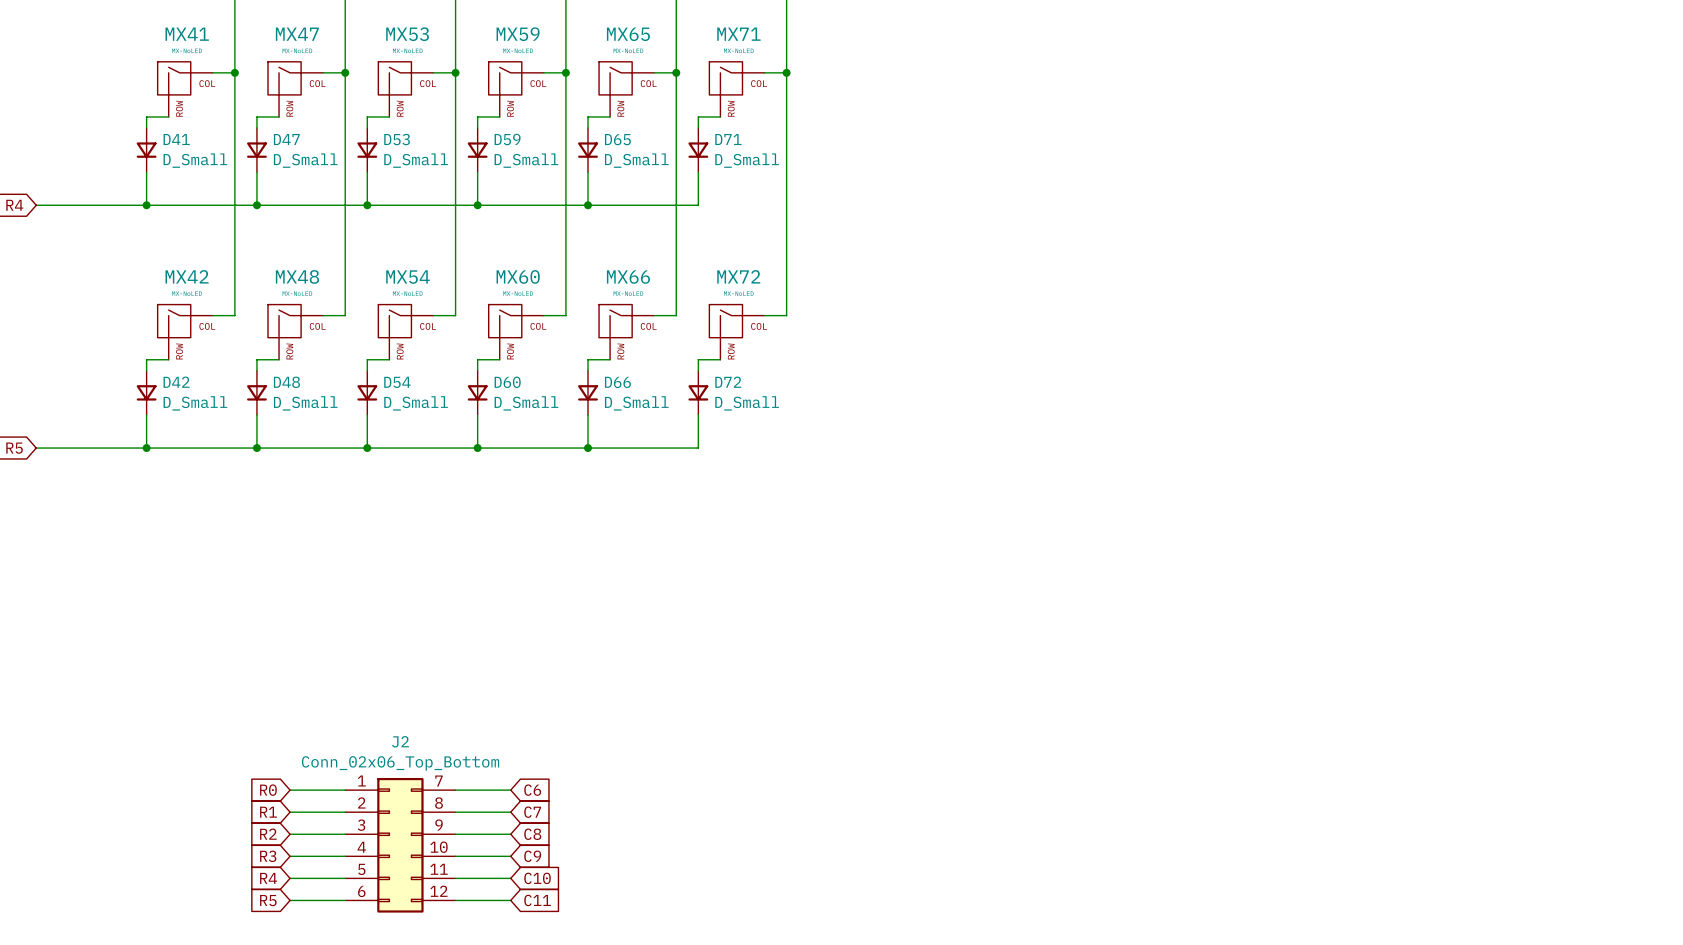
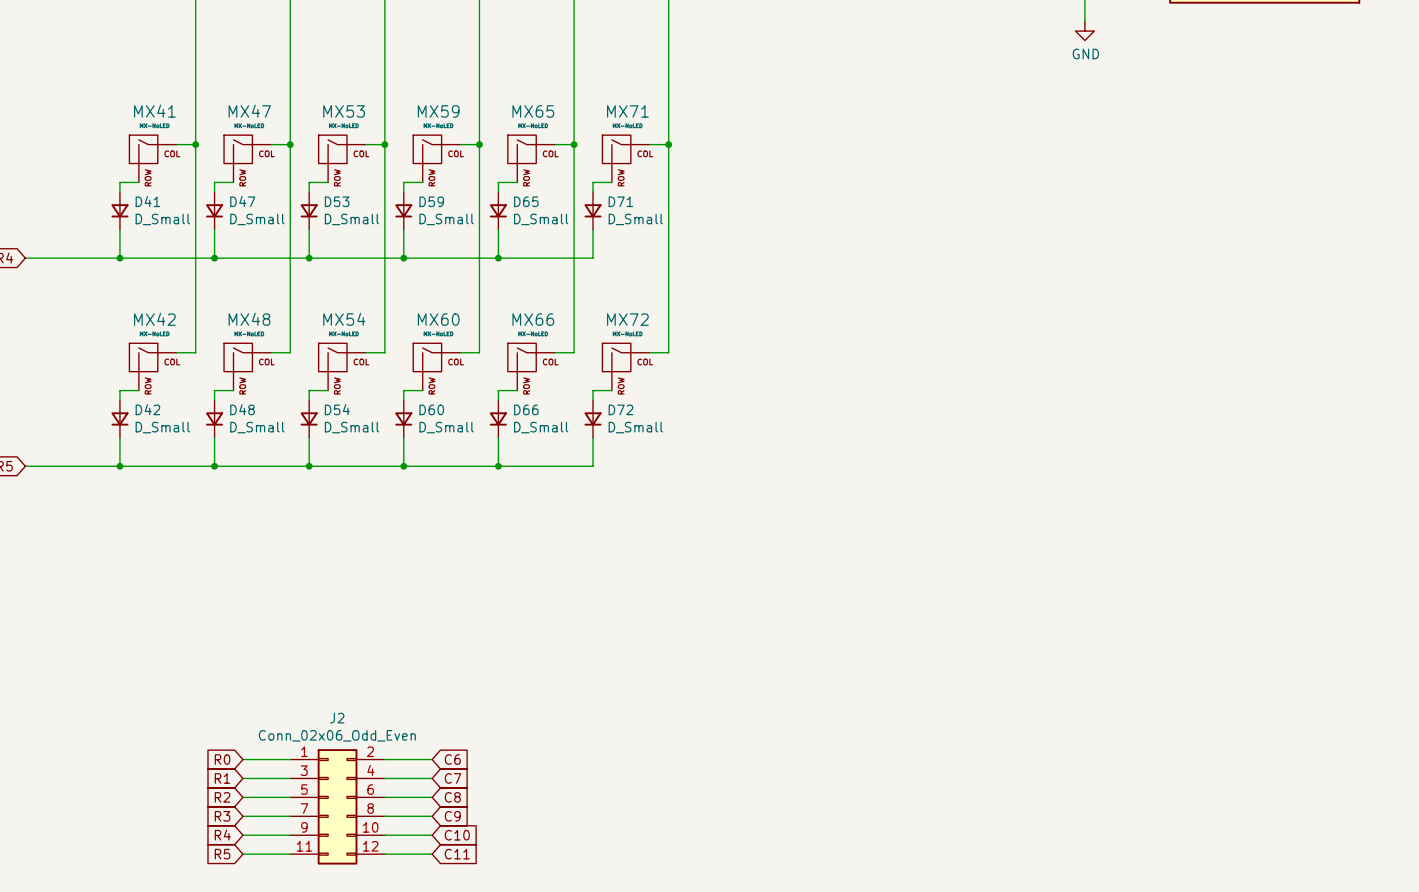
J2 value: Conn_02x06_Top_Bottom (400, 763) -> Conn_02x06_Odd_Even (337, 735)
J2 symbol: [345, 777, 456, 913] -> [290, 749, 385, 865]

